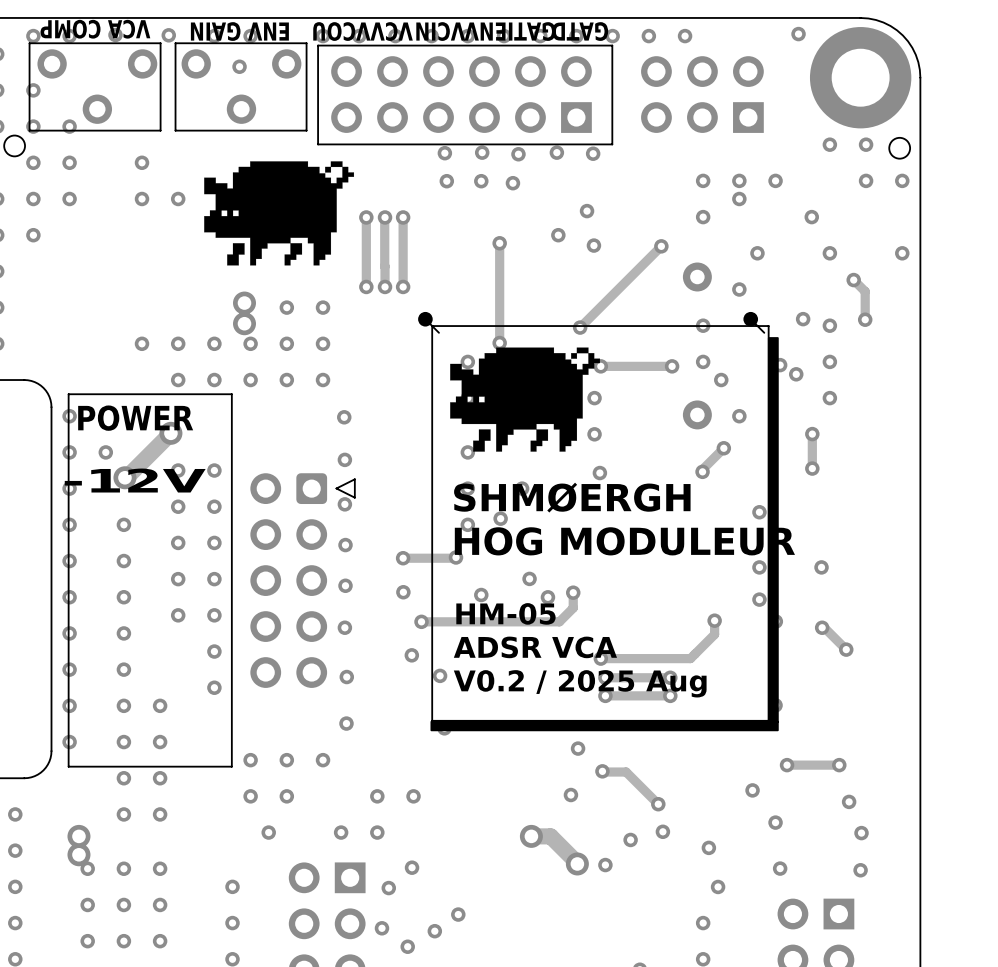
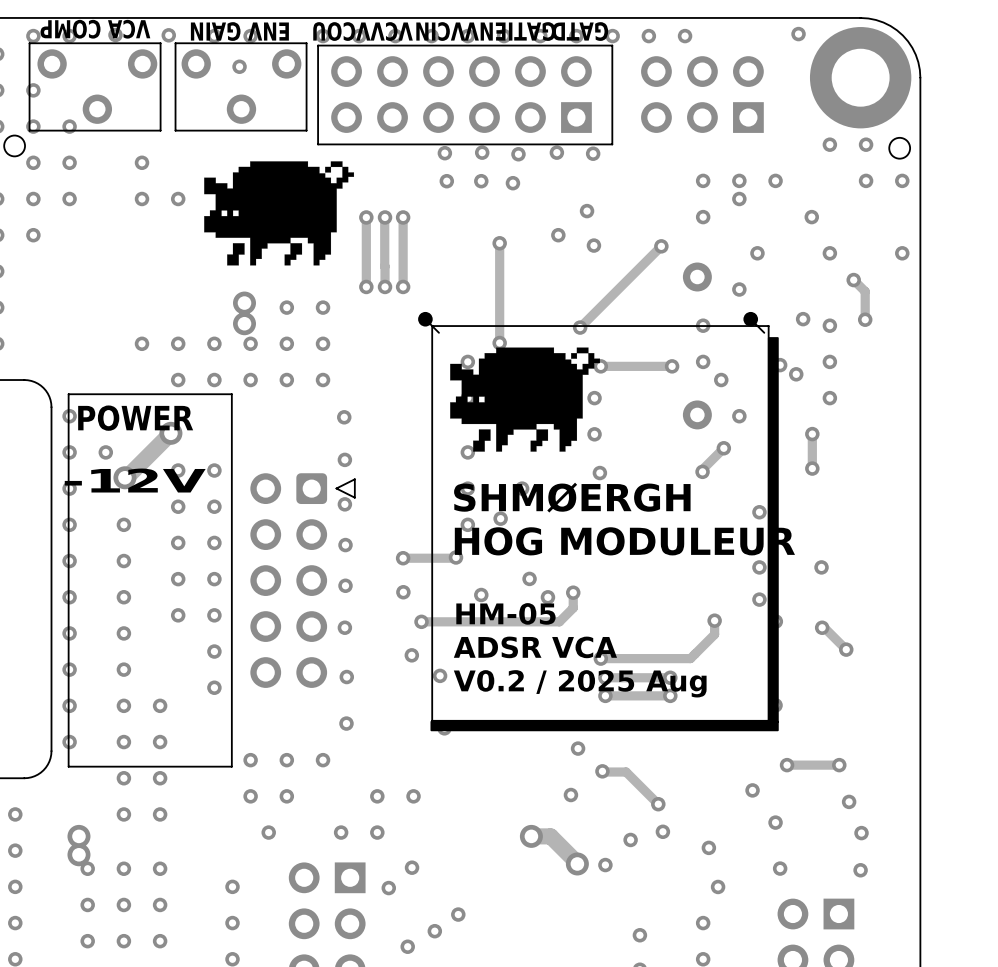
via: (381, 928) -> none
via: none -> (639, 935)

